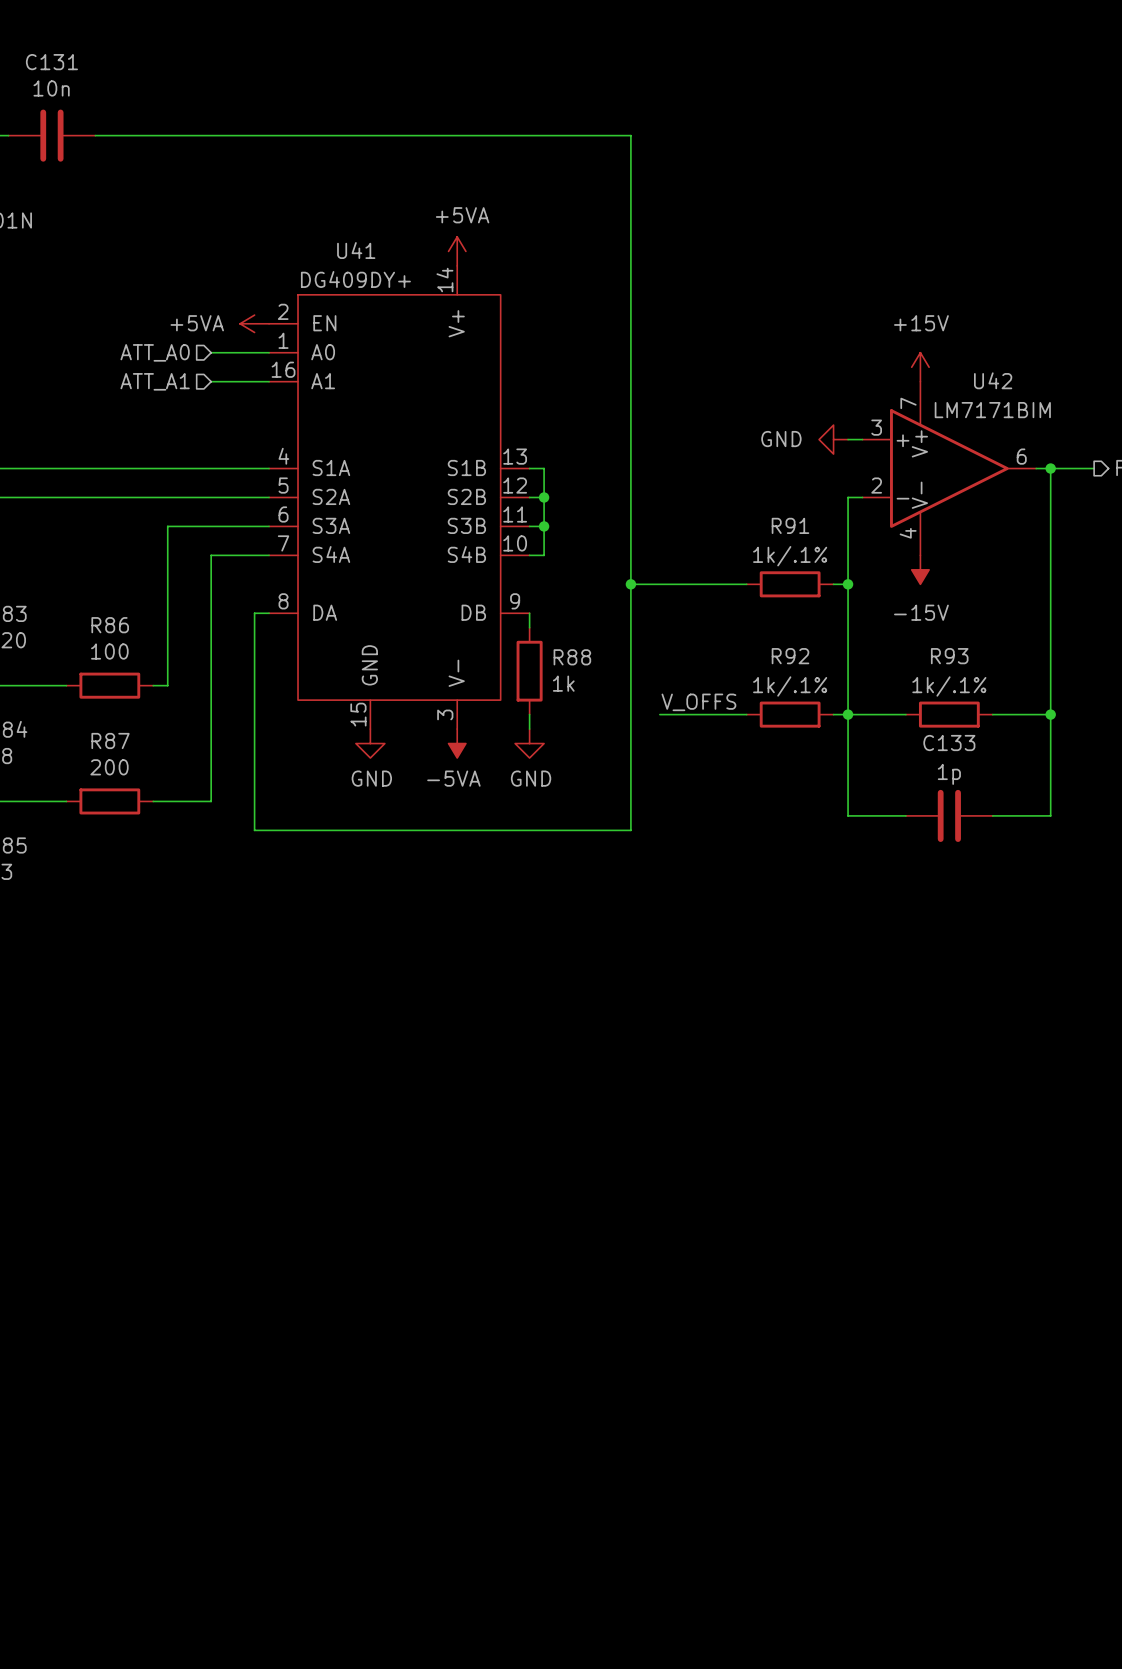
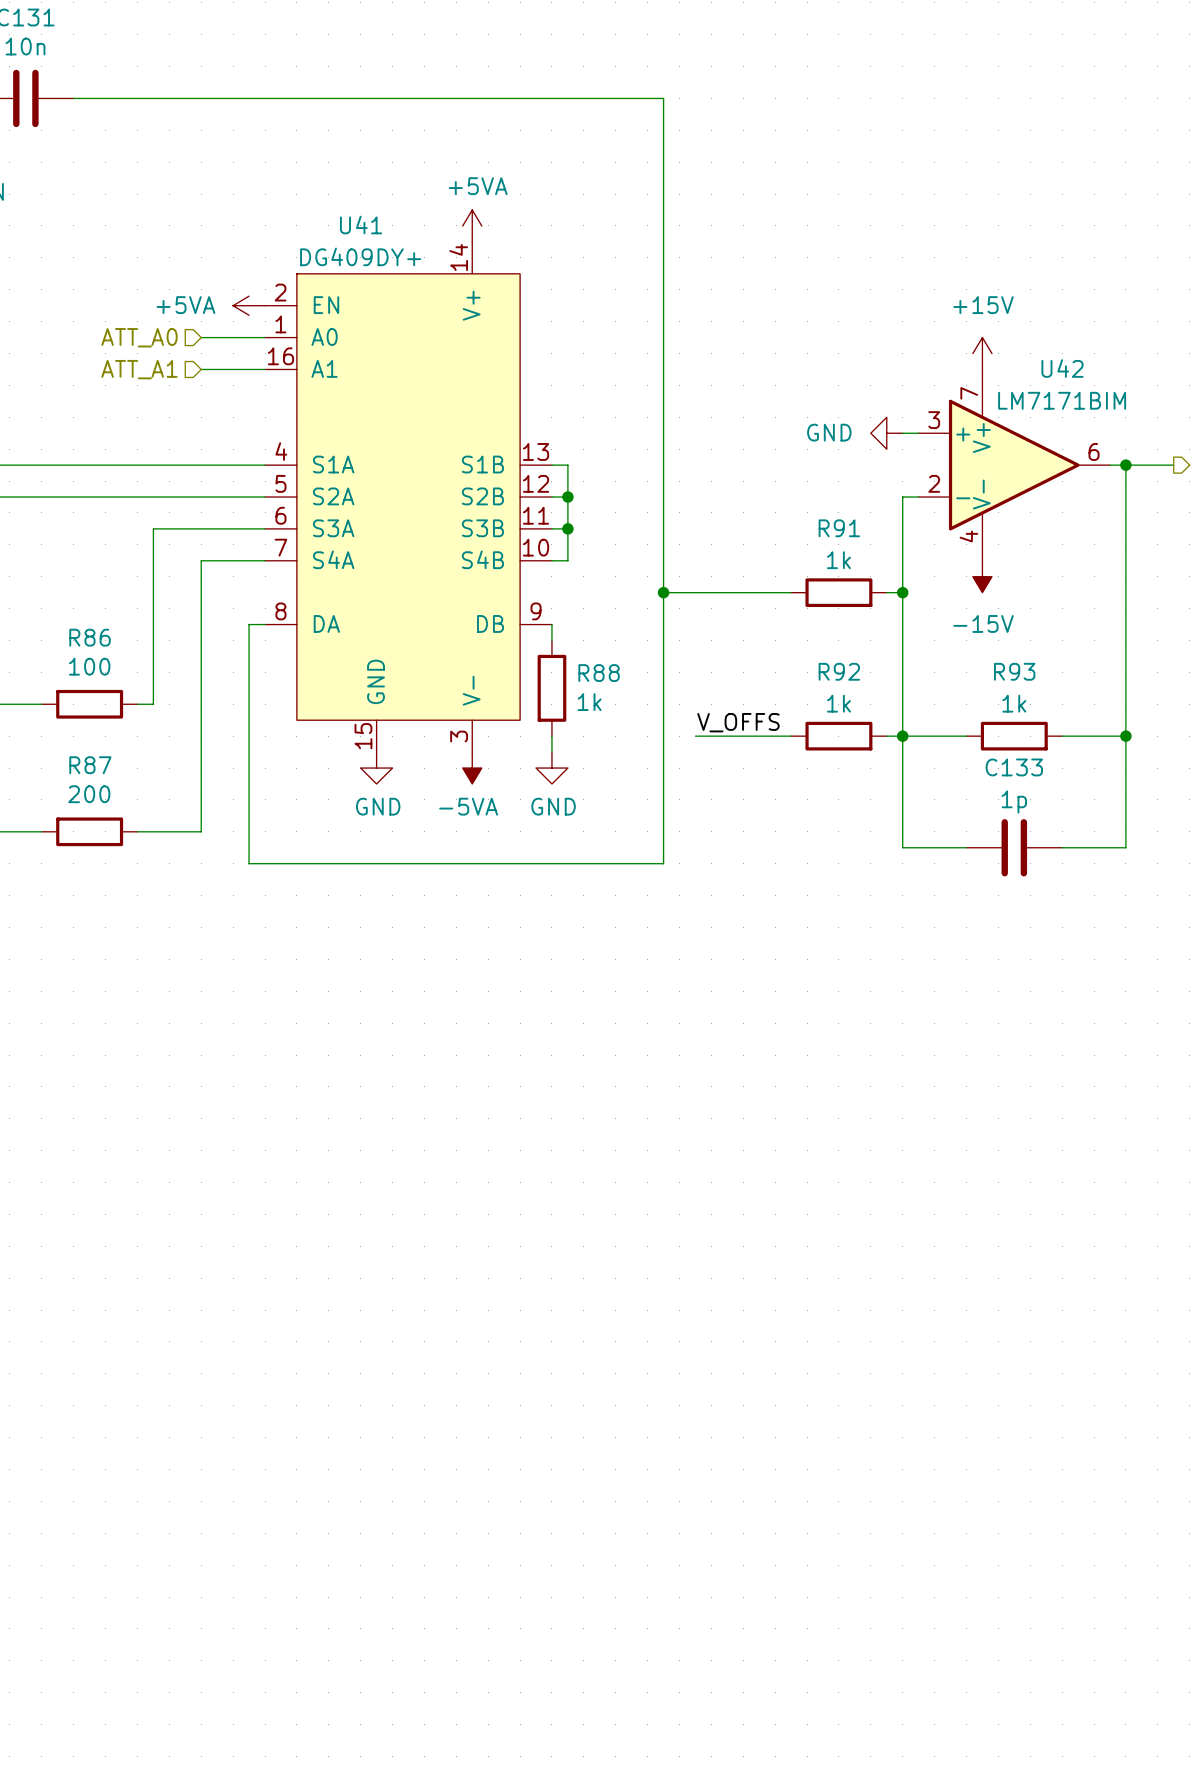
R91 value: 1k/.1% (790, 556) -> 1k (838, 560)
R92 value: 1k/.1% (790, 686) -> 1k (838, 703)
R93 value: 1k/.1% (949, 686) -> 1k (1014, 703)

